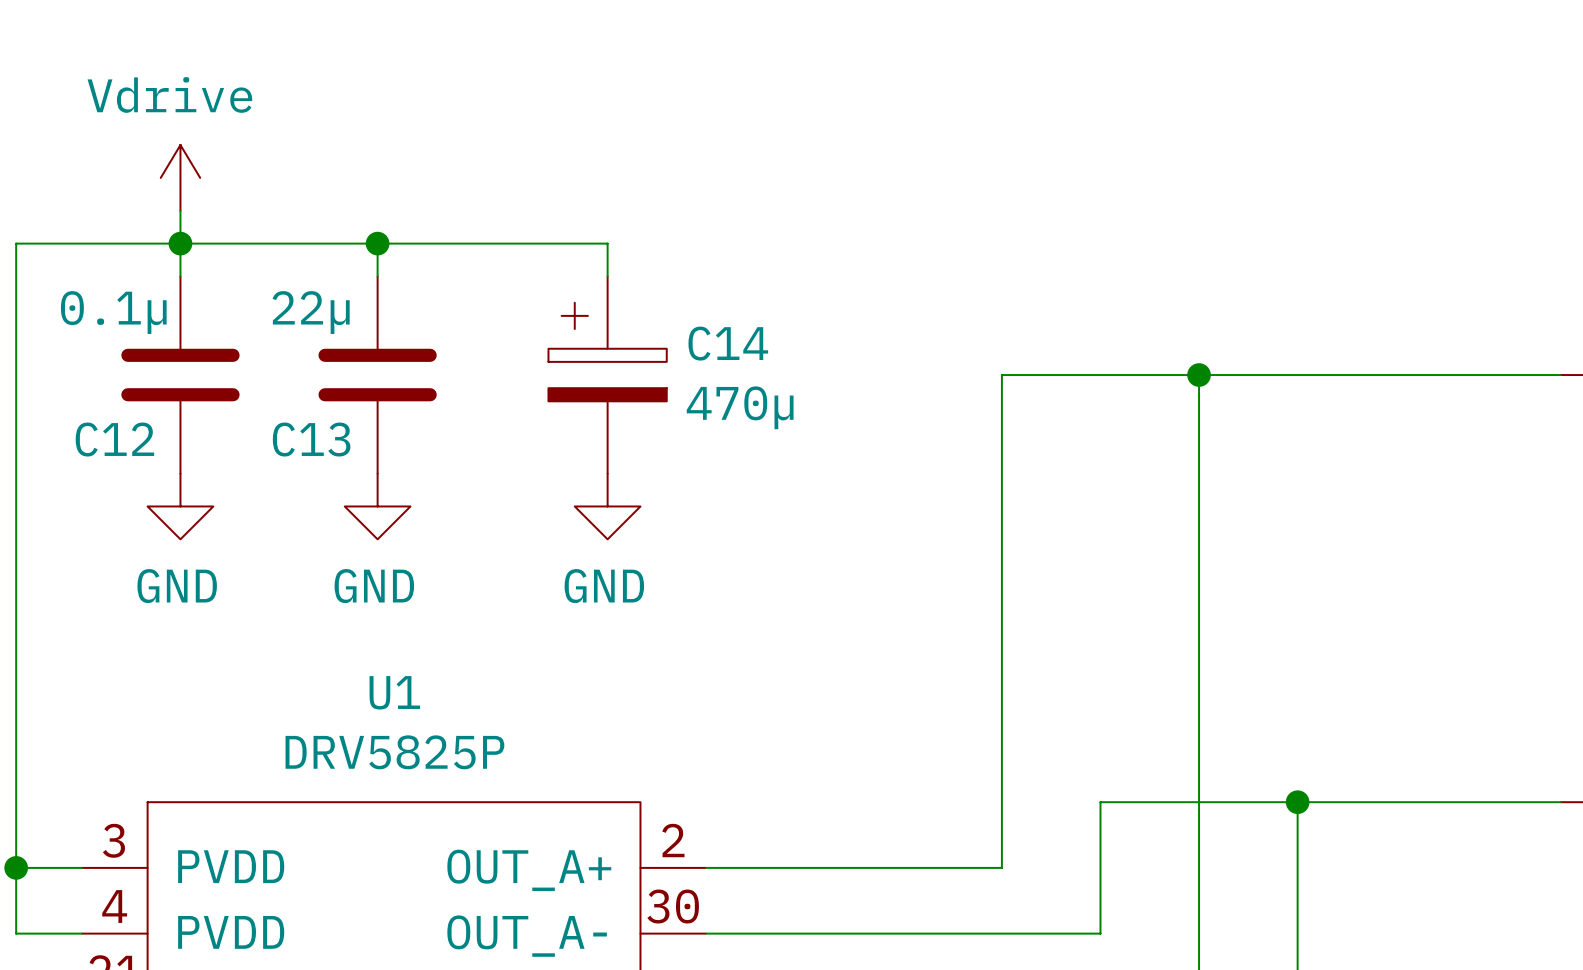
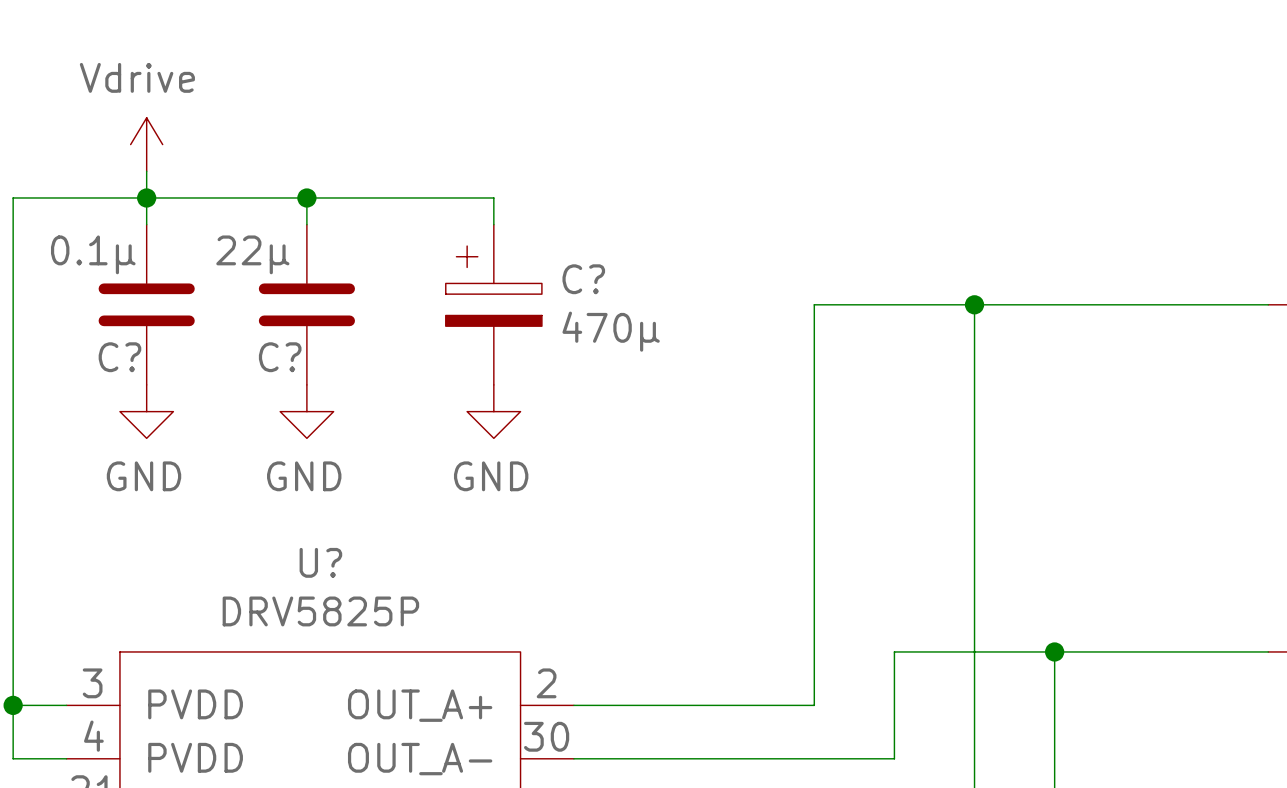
C14 name: C14 (728, 343) -> C? (583, 279)
C12 name: C12 (114, 439) -> C? (119, 357)
C13 name: C13 (311, 439) -> C? (280, 357)
U1 name: U1 (394, 692) -> U? (320, 562)

